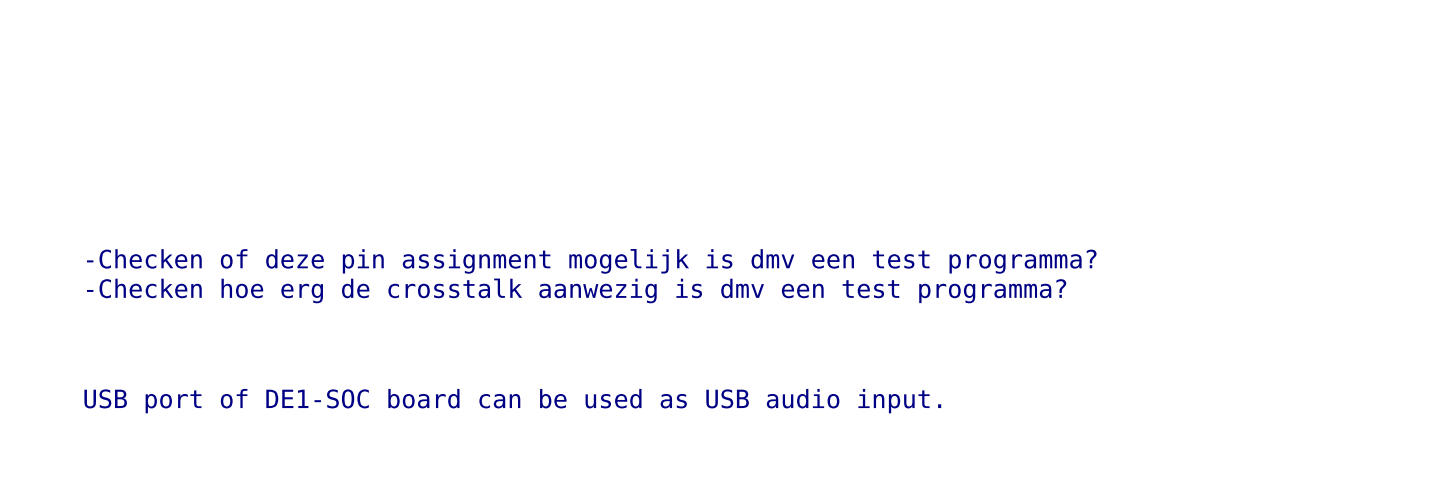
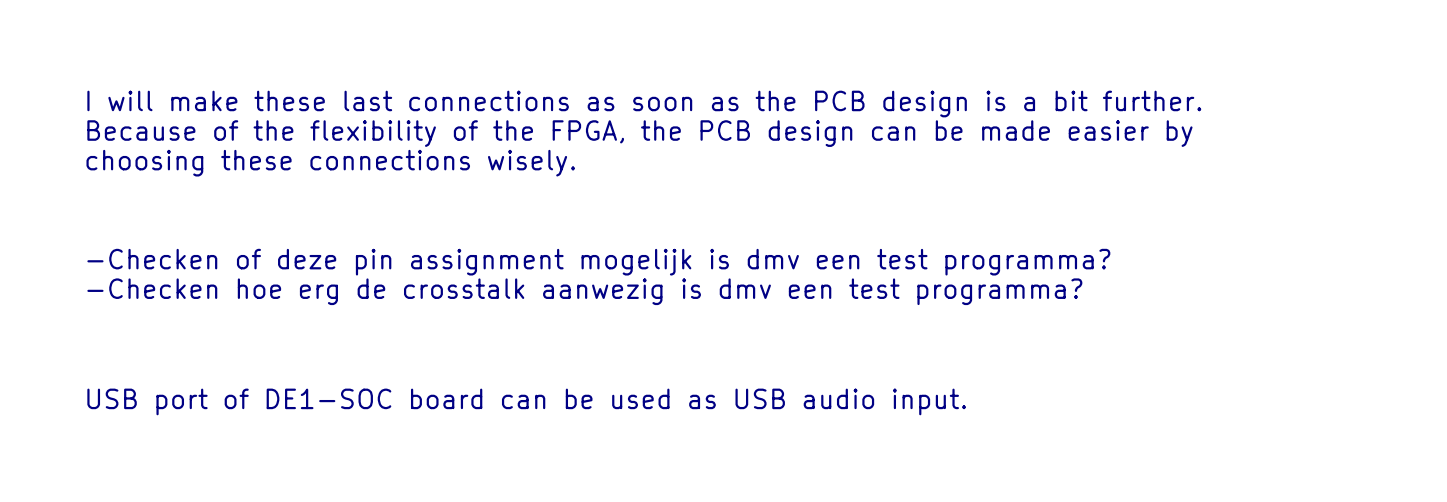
text: none -> I will make these last connections as soon as the PCB design is a bit further. (644, 104)
text: none -> Because of the flexibility of the FPGA, the PCB design can be made easier by (639, 133)
text: none -> choosing these connections wisely. (330, 163)

